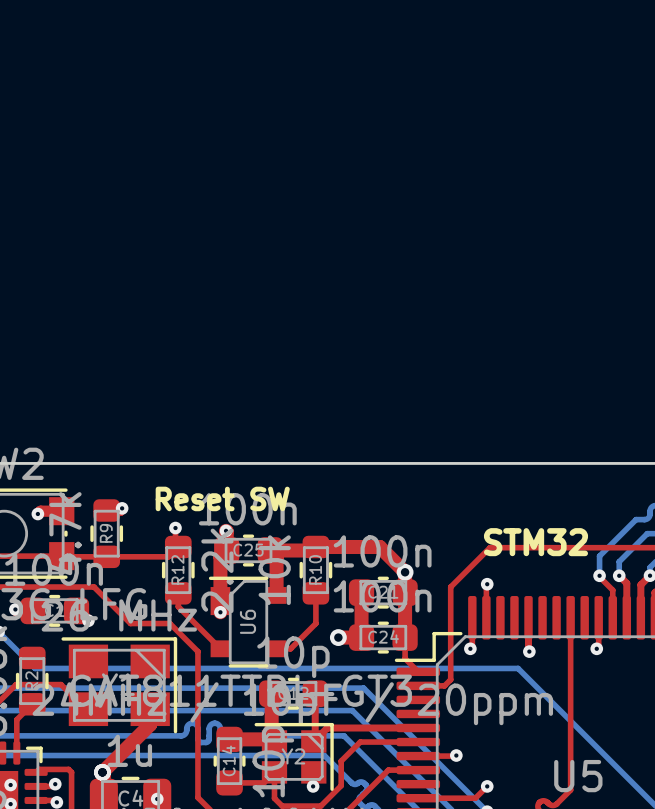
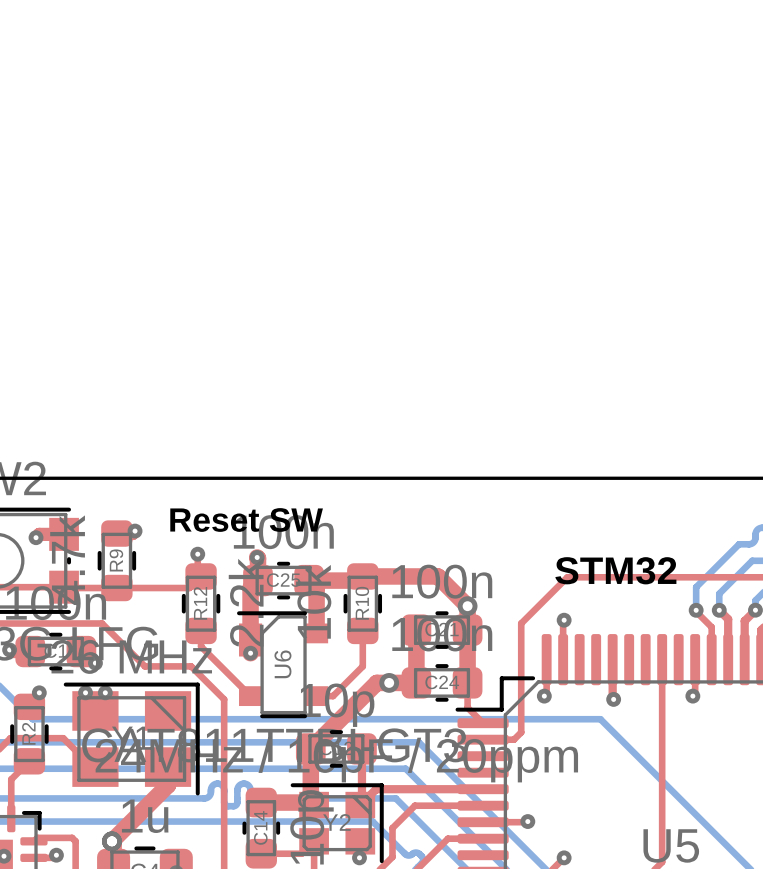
top track: none -> (389, 682) (376, 682) (310, 748)
via: none -> (39, 692)
via: none -> (85, 692)
via: none -> (105, 692)

